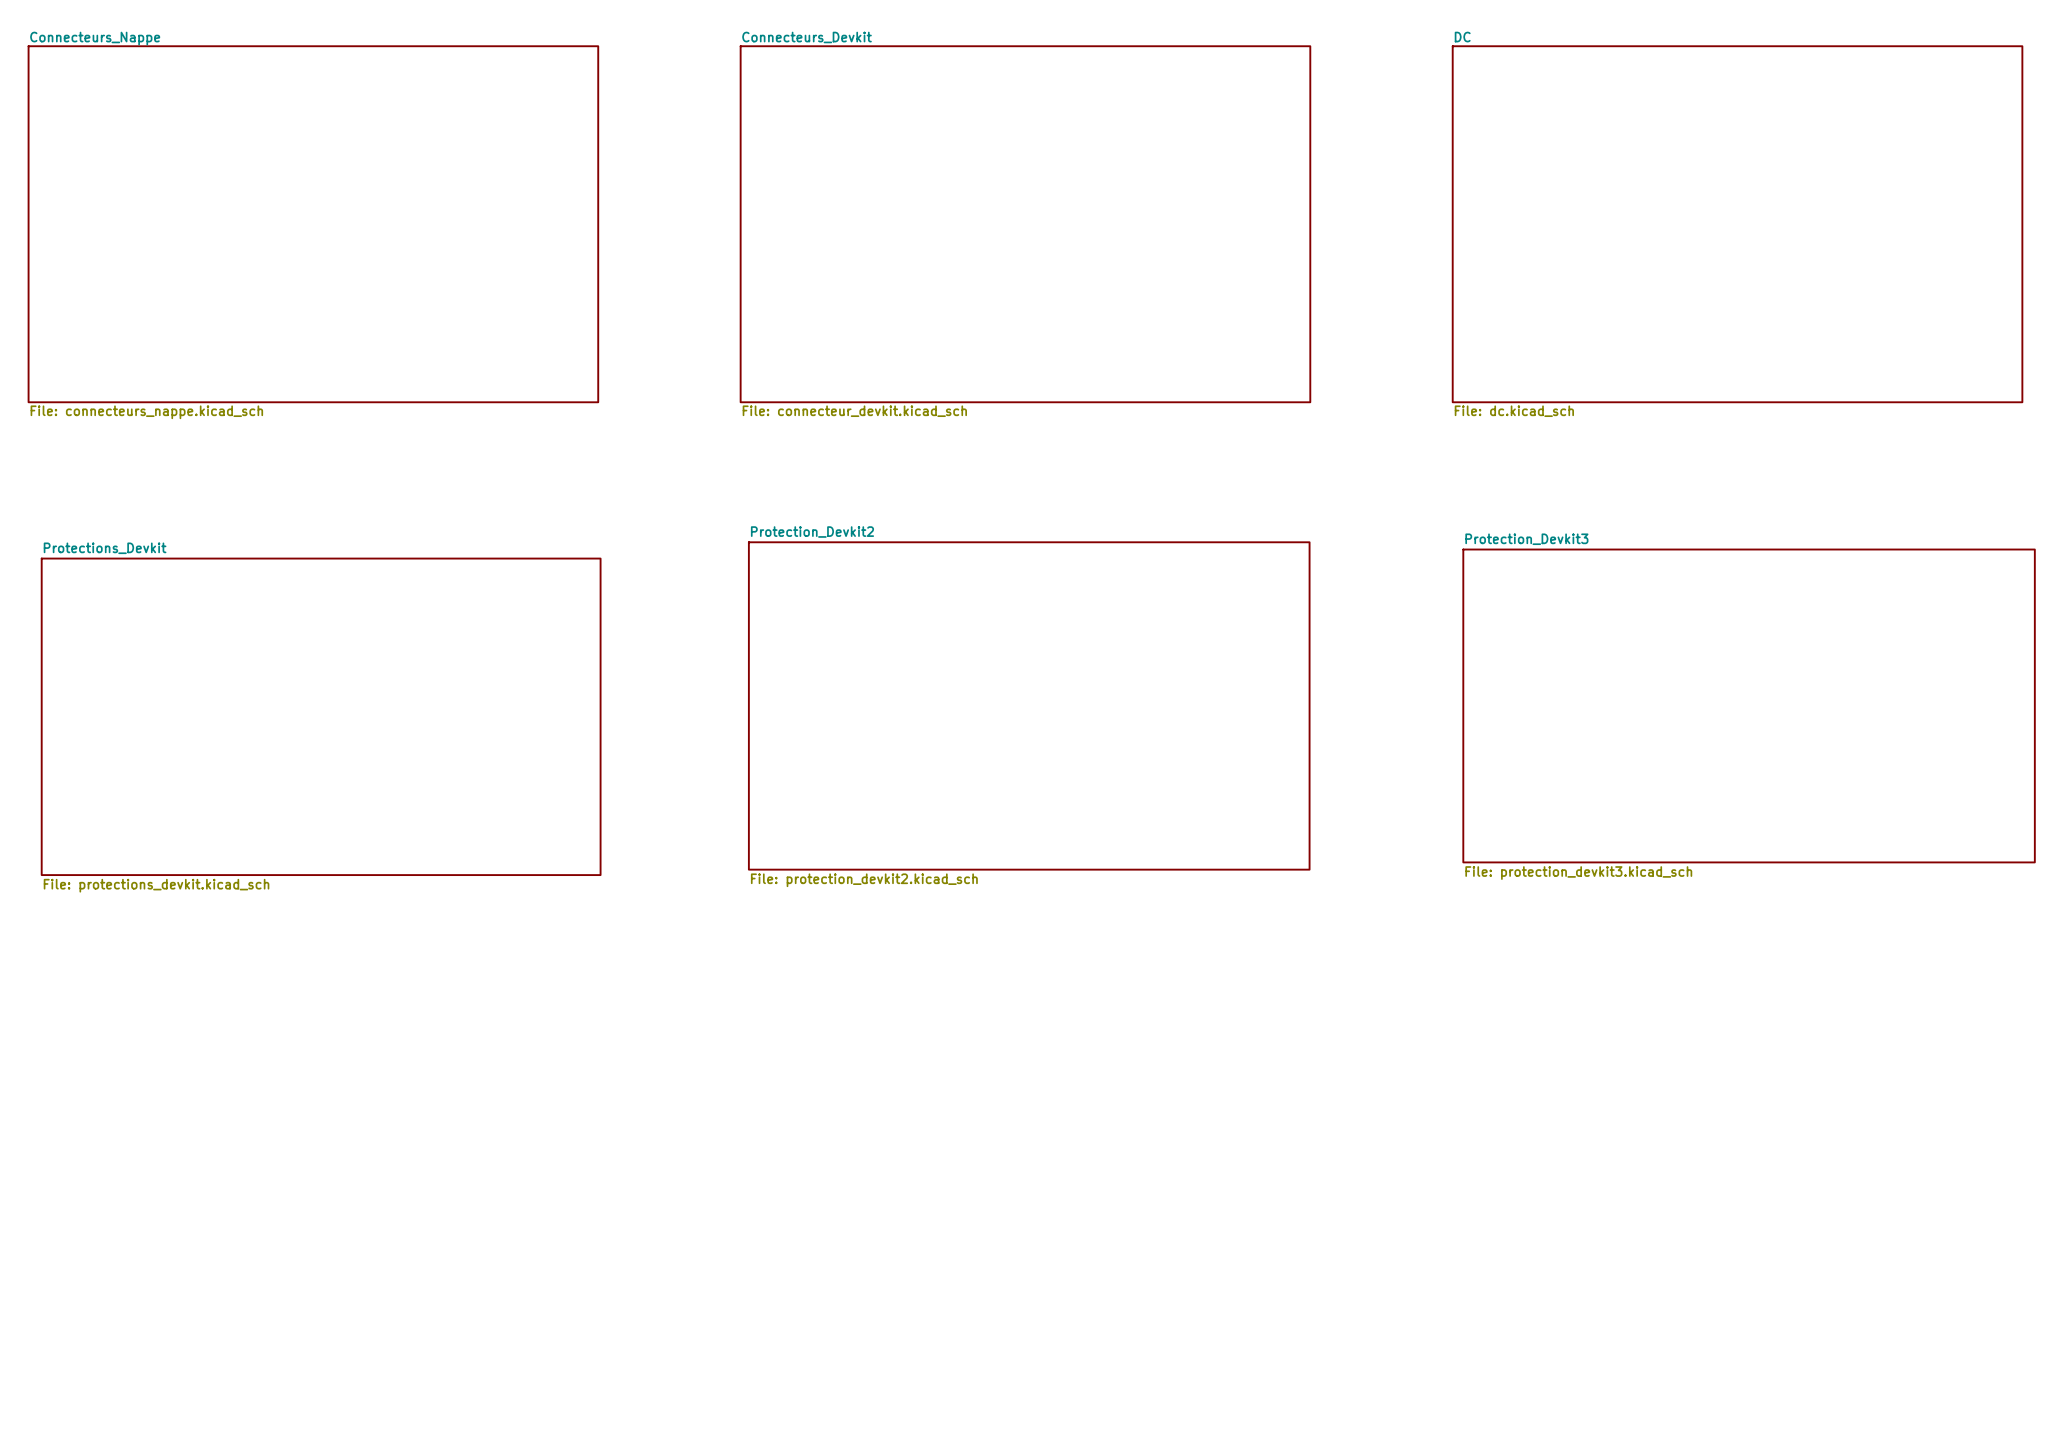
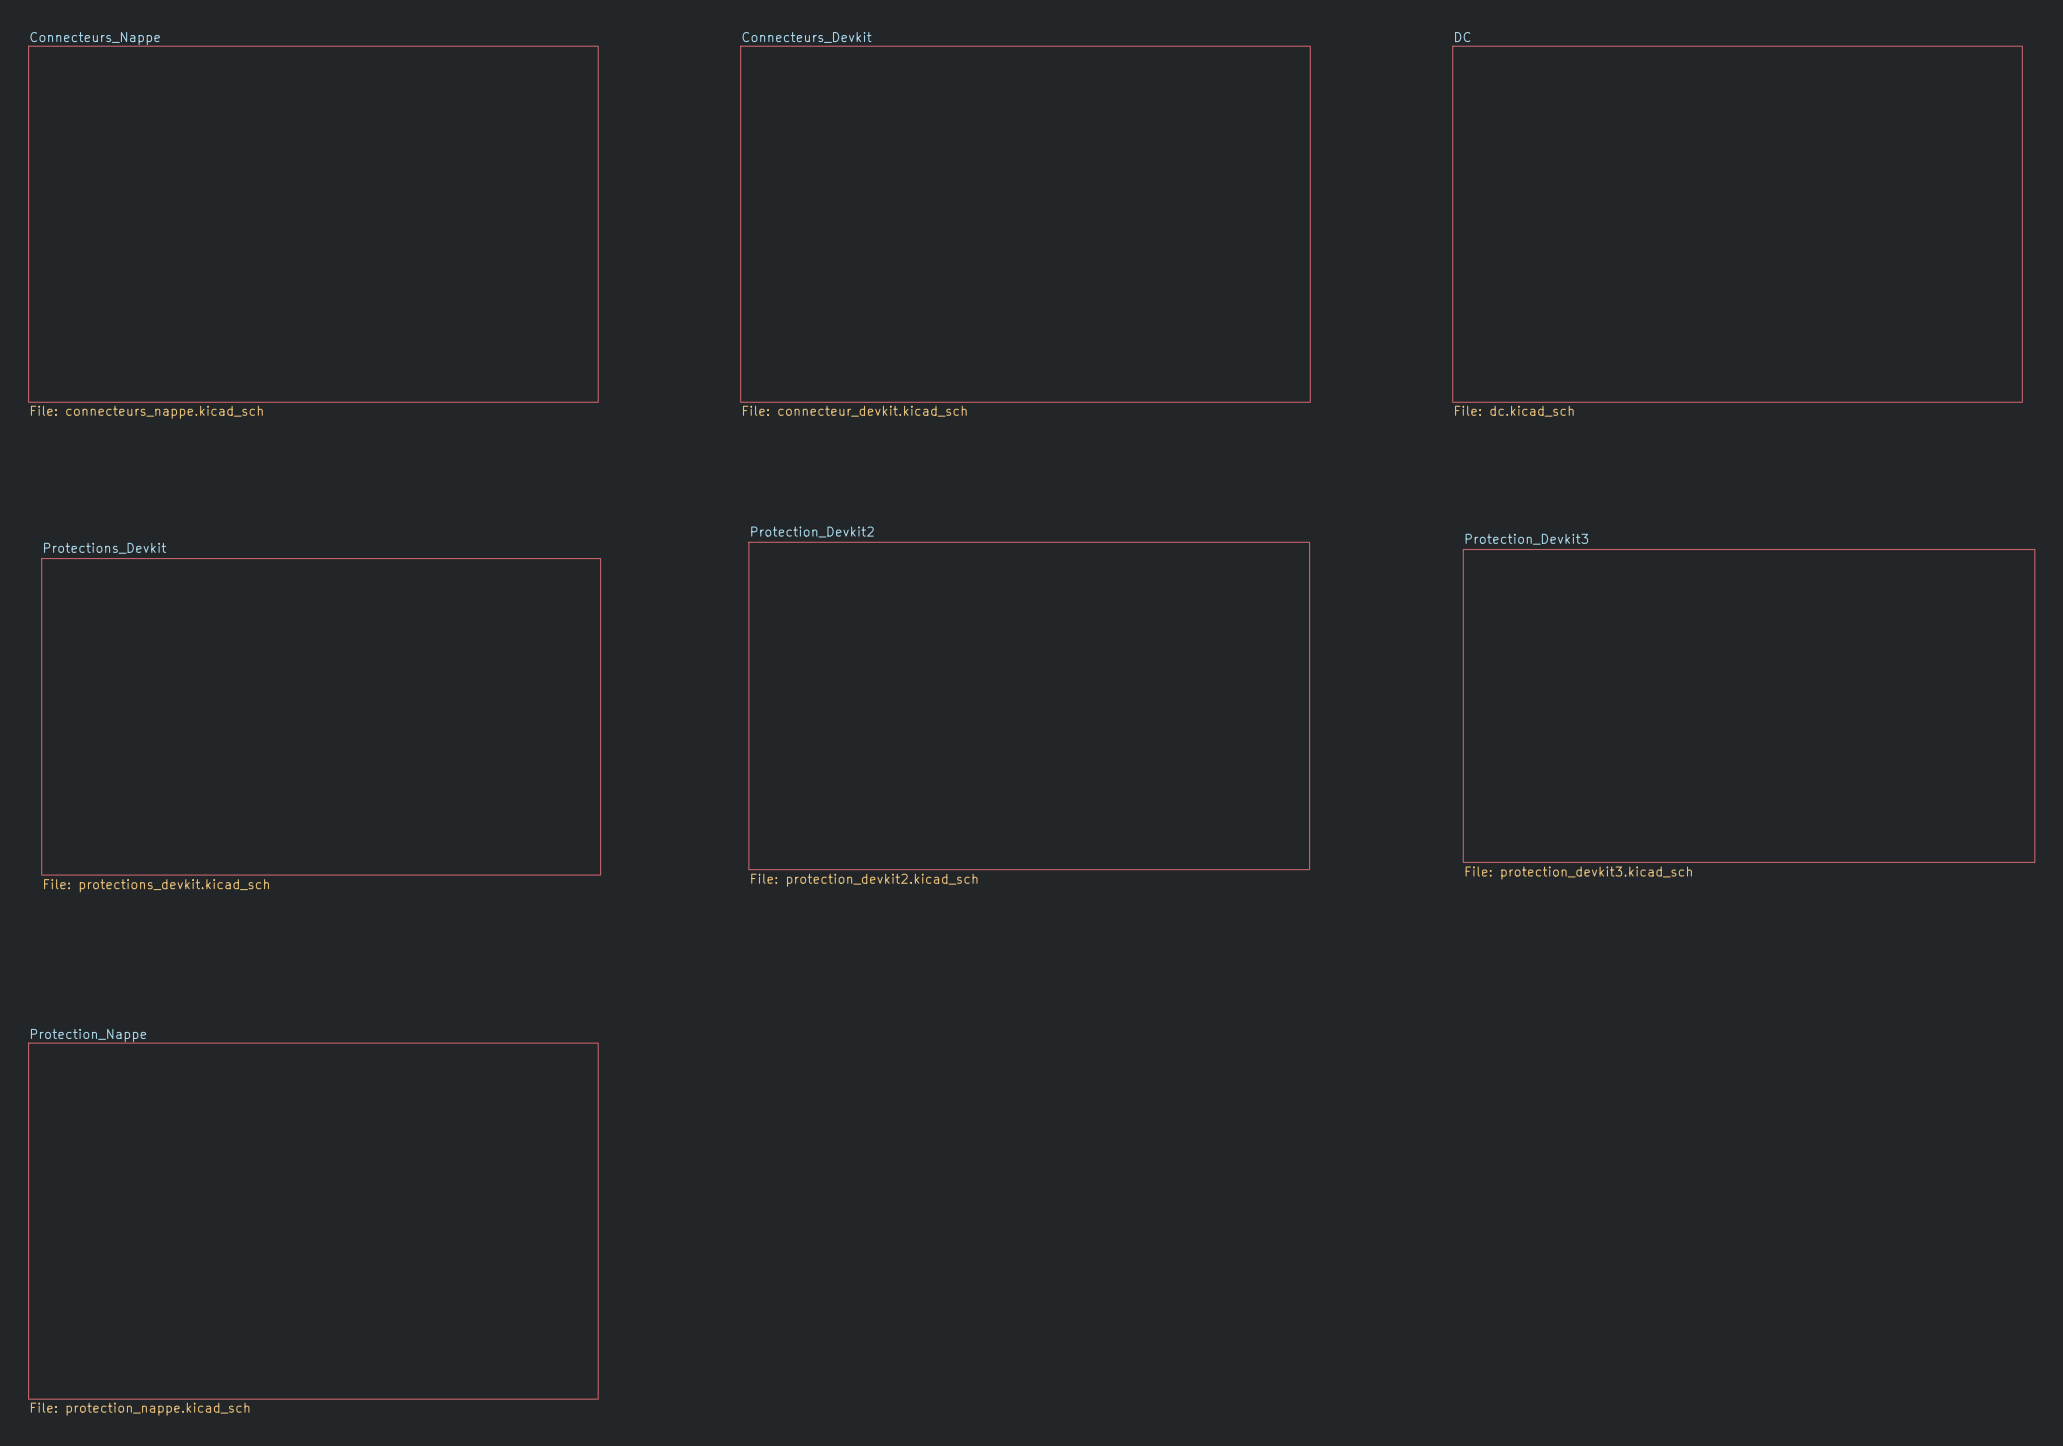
sheet Protection_Nappe: none -> File: protection_nappe.kicad_sch (313, 1221)

